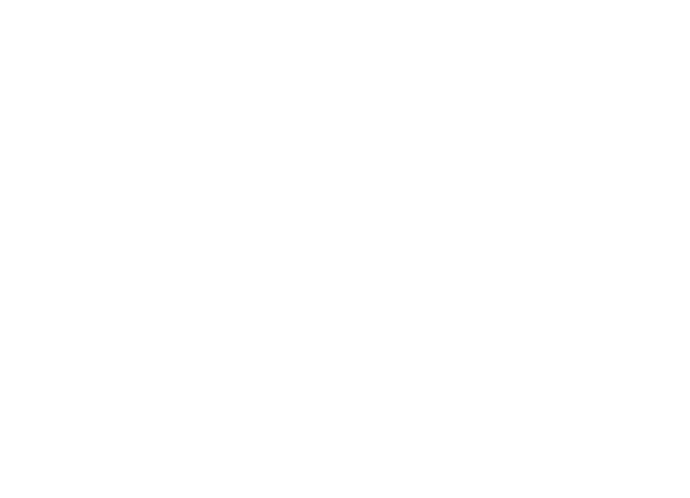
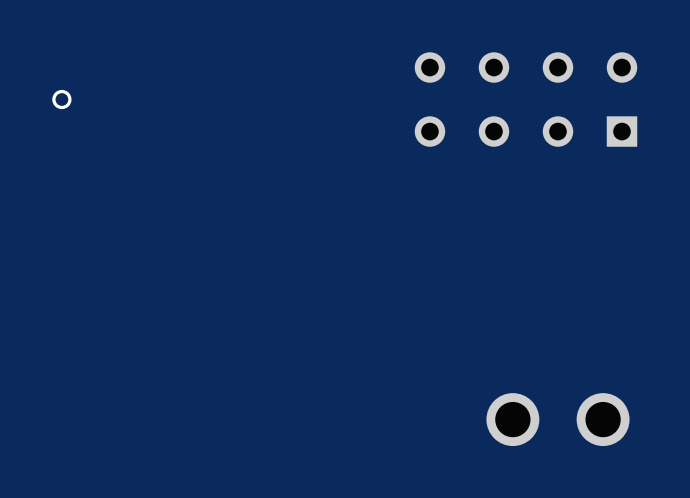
part: none -> (61, 99)
part: none -> (525, 99)
part: none -> (557, 419)

